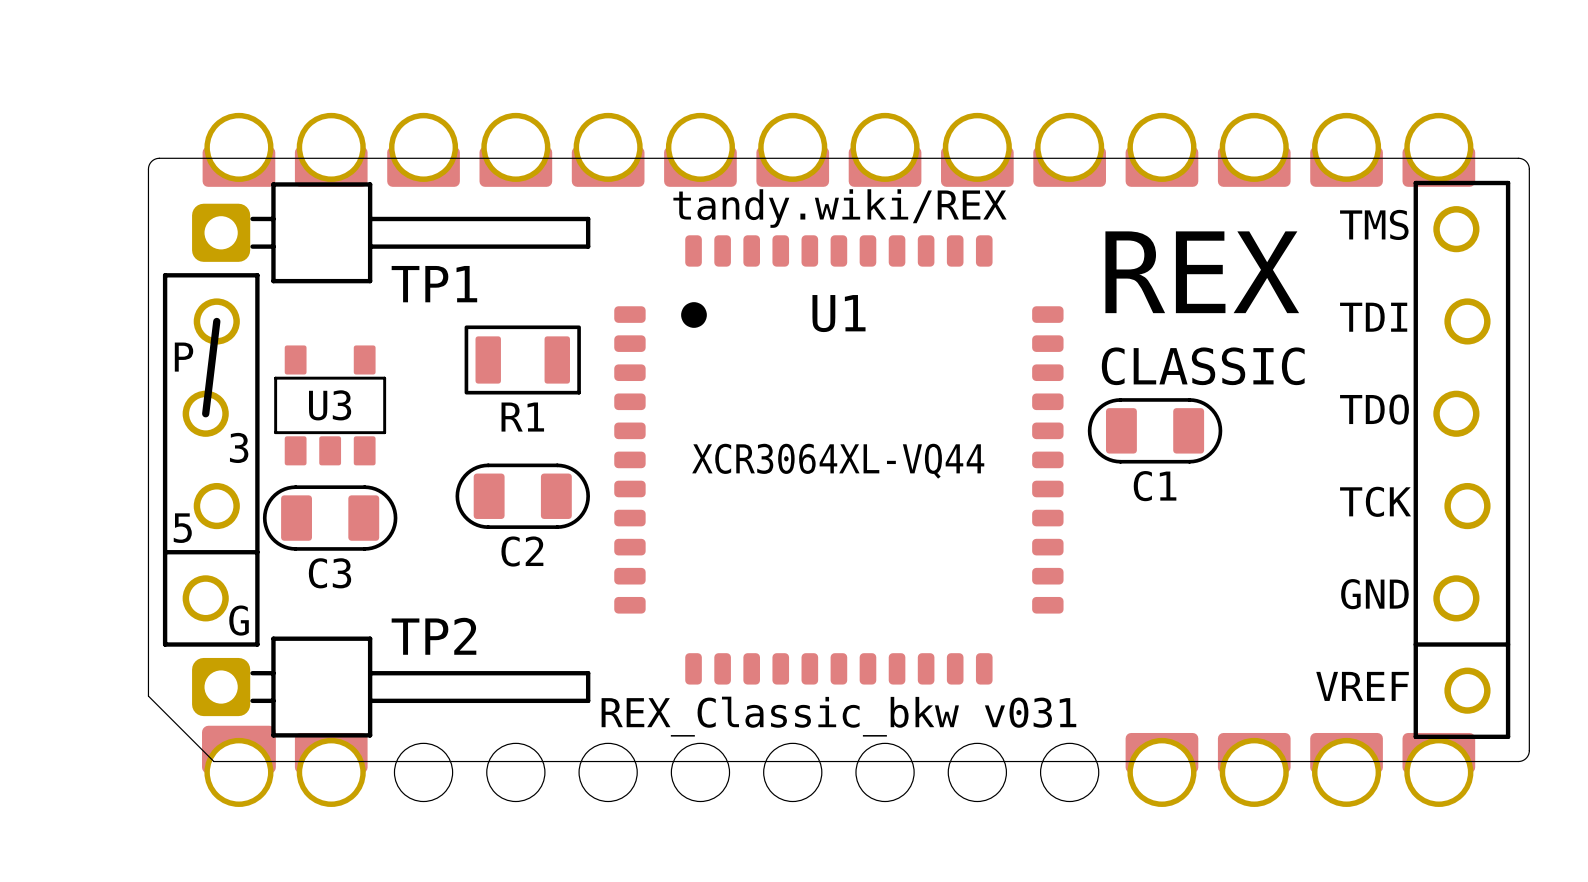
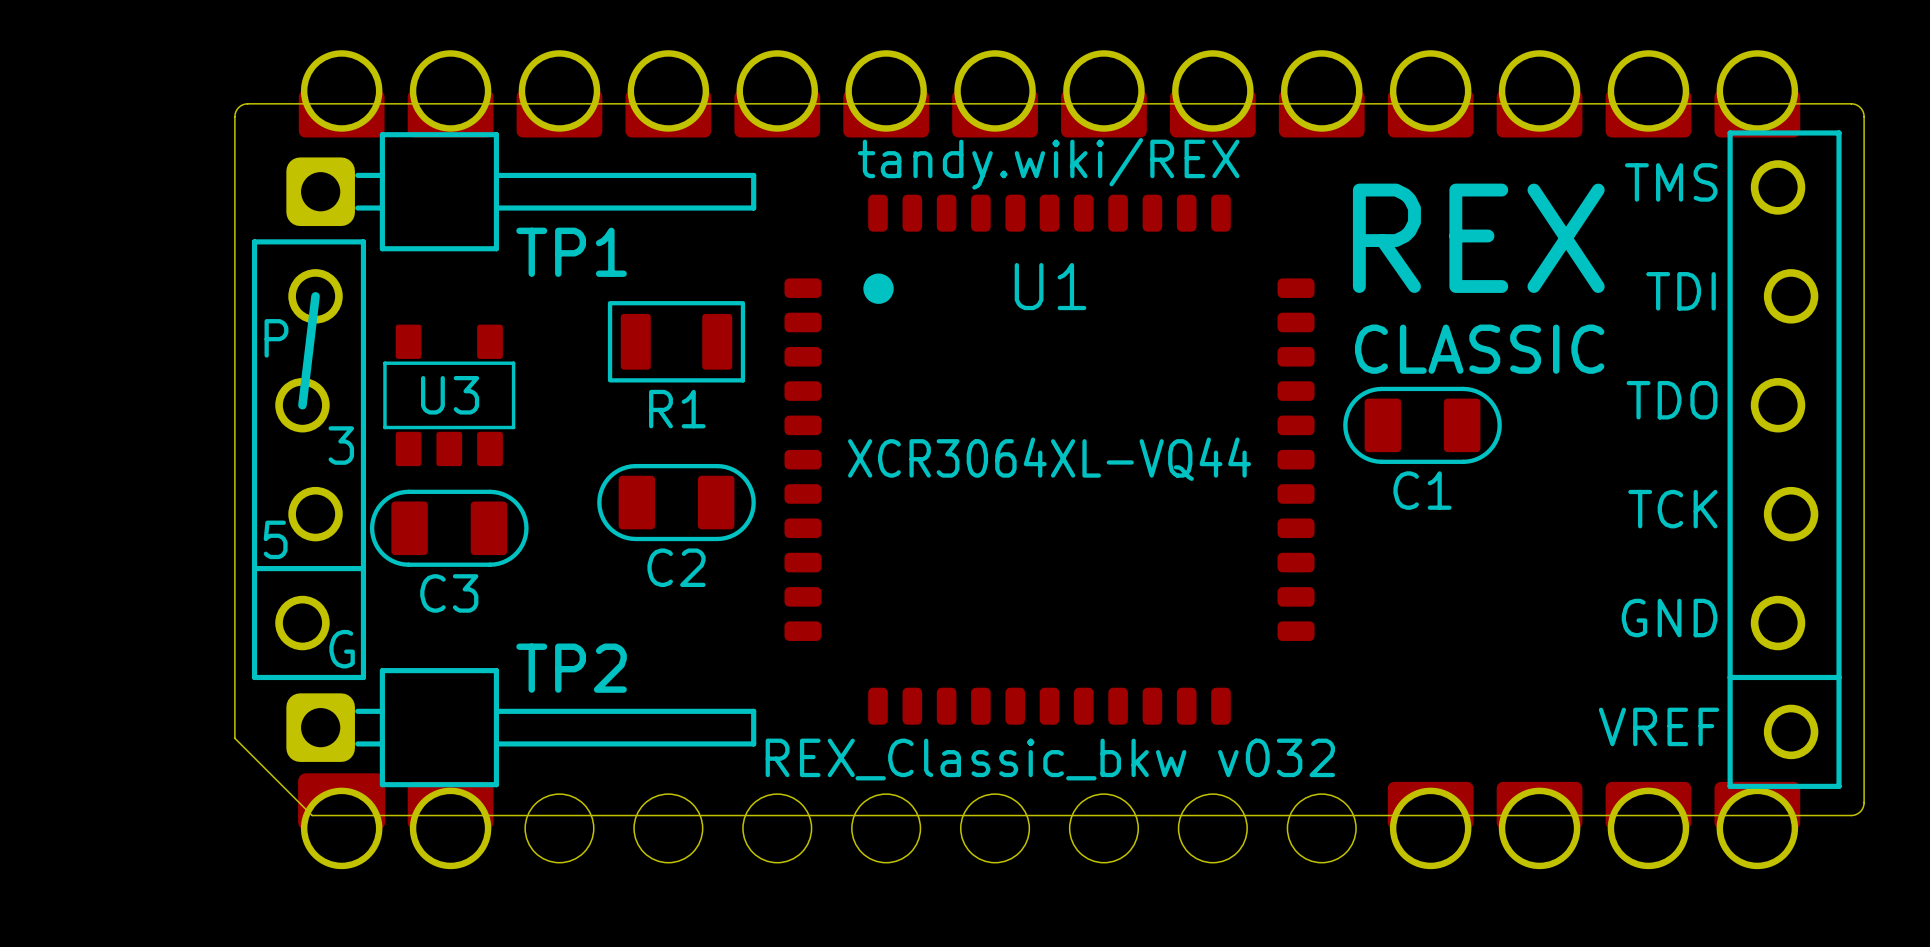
text: REX_Classic_bkw v031 (838, 716) -> REX_Classic_bkw v032 (1050, 759)

